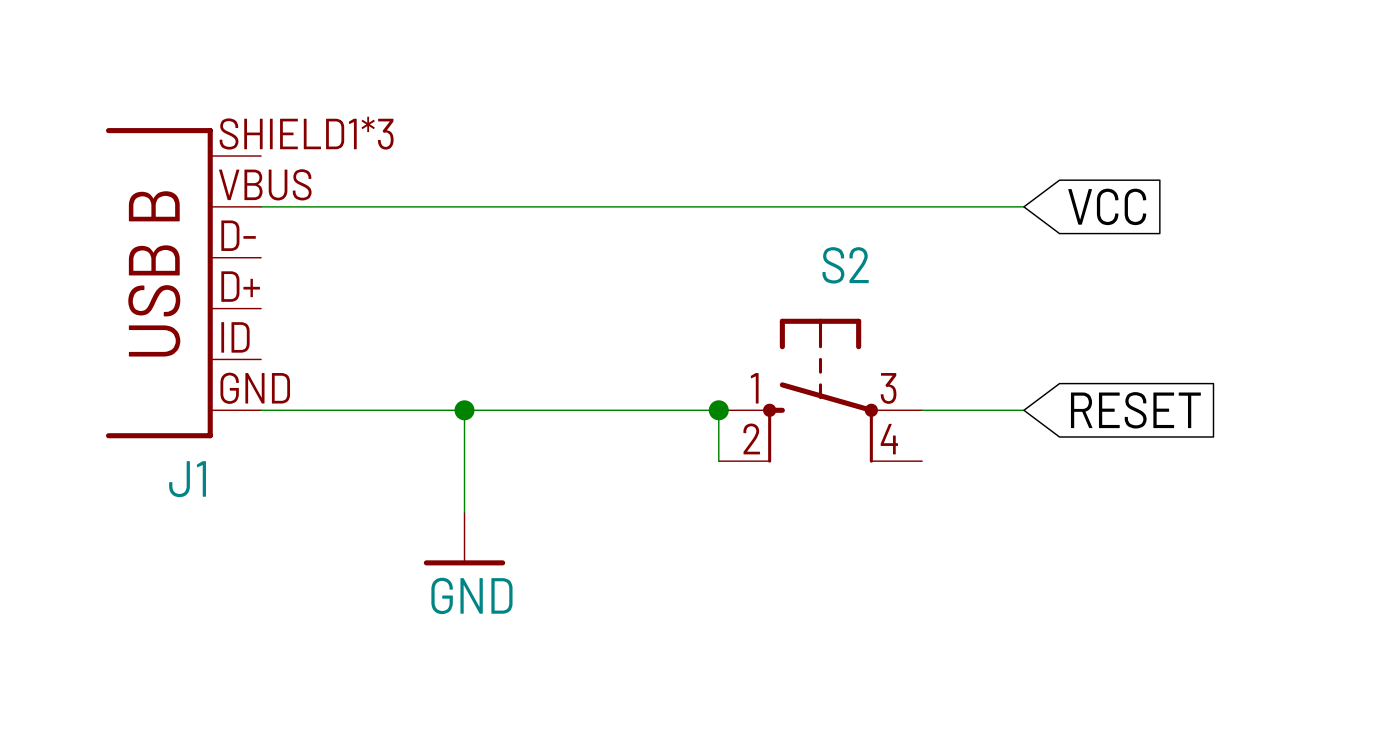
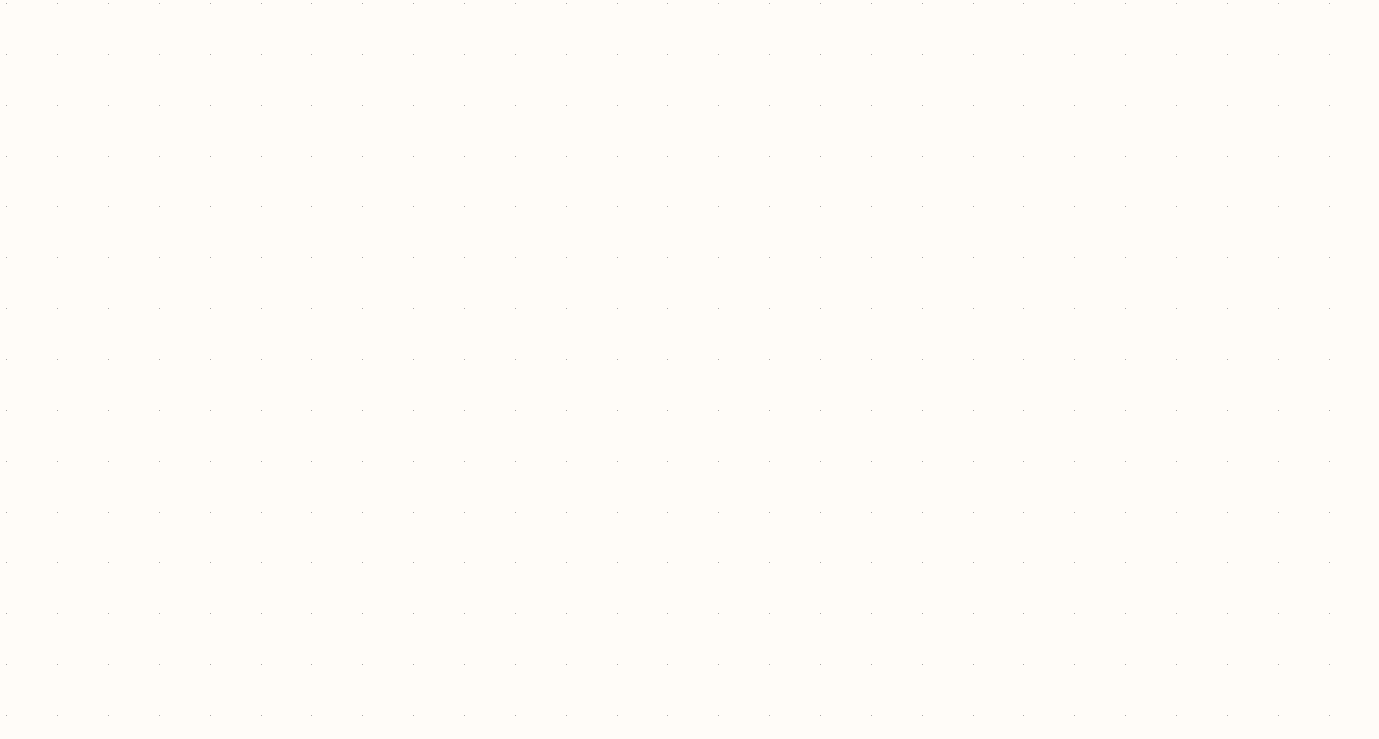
wire: (261, 206) (1023, 206) -> none
global label: VCC (1107, 206) -> none
J1: (183, 283) -> none
S2: (820, 390) -> none
wire: (261, 410) (718, 410) (718, 461) -> none
wire: (464, 410) (464, 512) -> none
junction: (464, 410) -> none
junction: (718, 410) -> none
wire: (922, 410) (1023, 410) -> none
global label: RESET (1135, 410) -> none
power symbol: GND (464, 538) -> none

